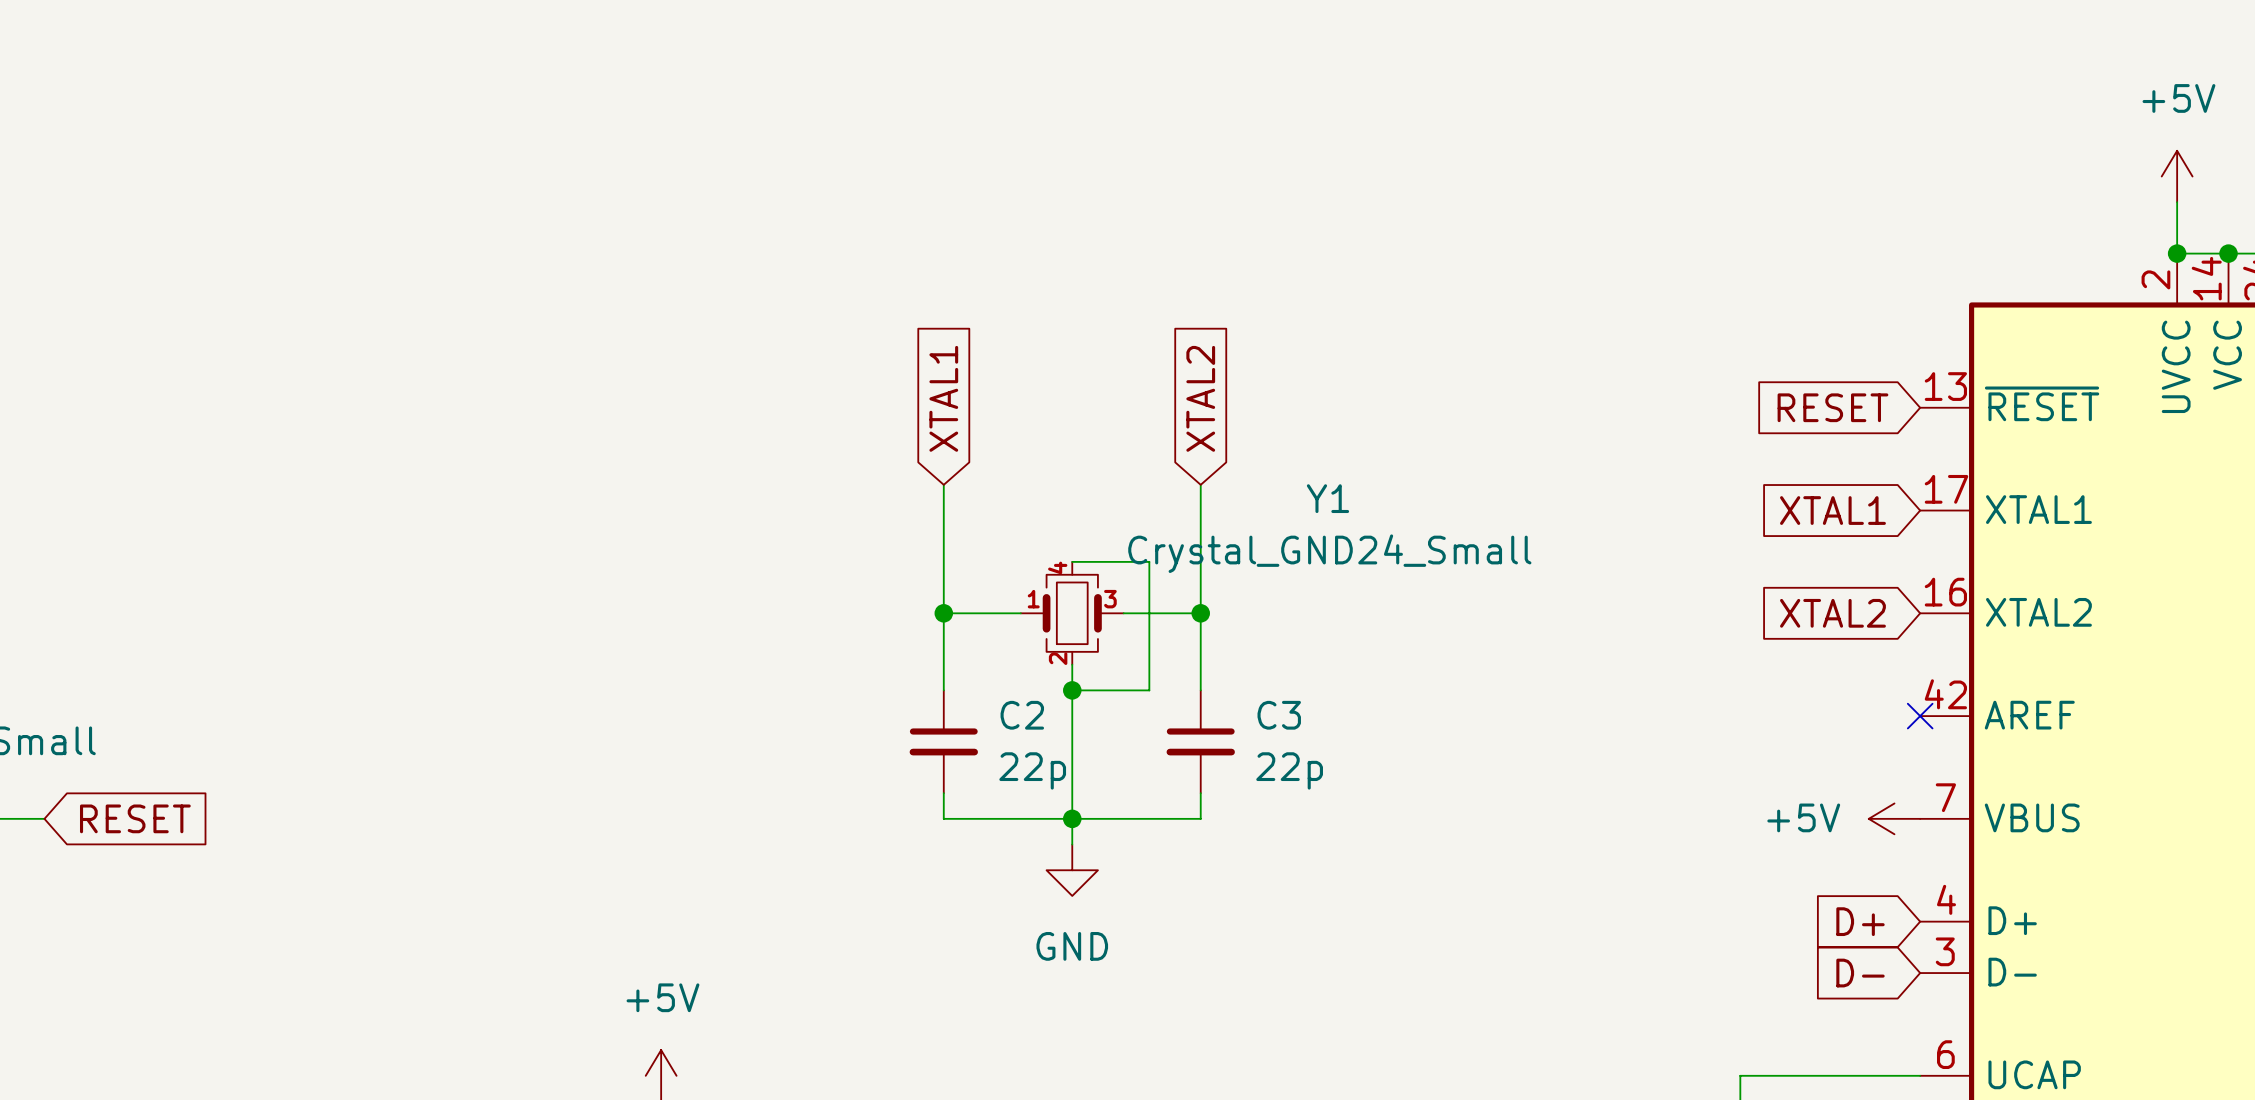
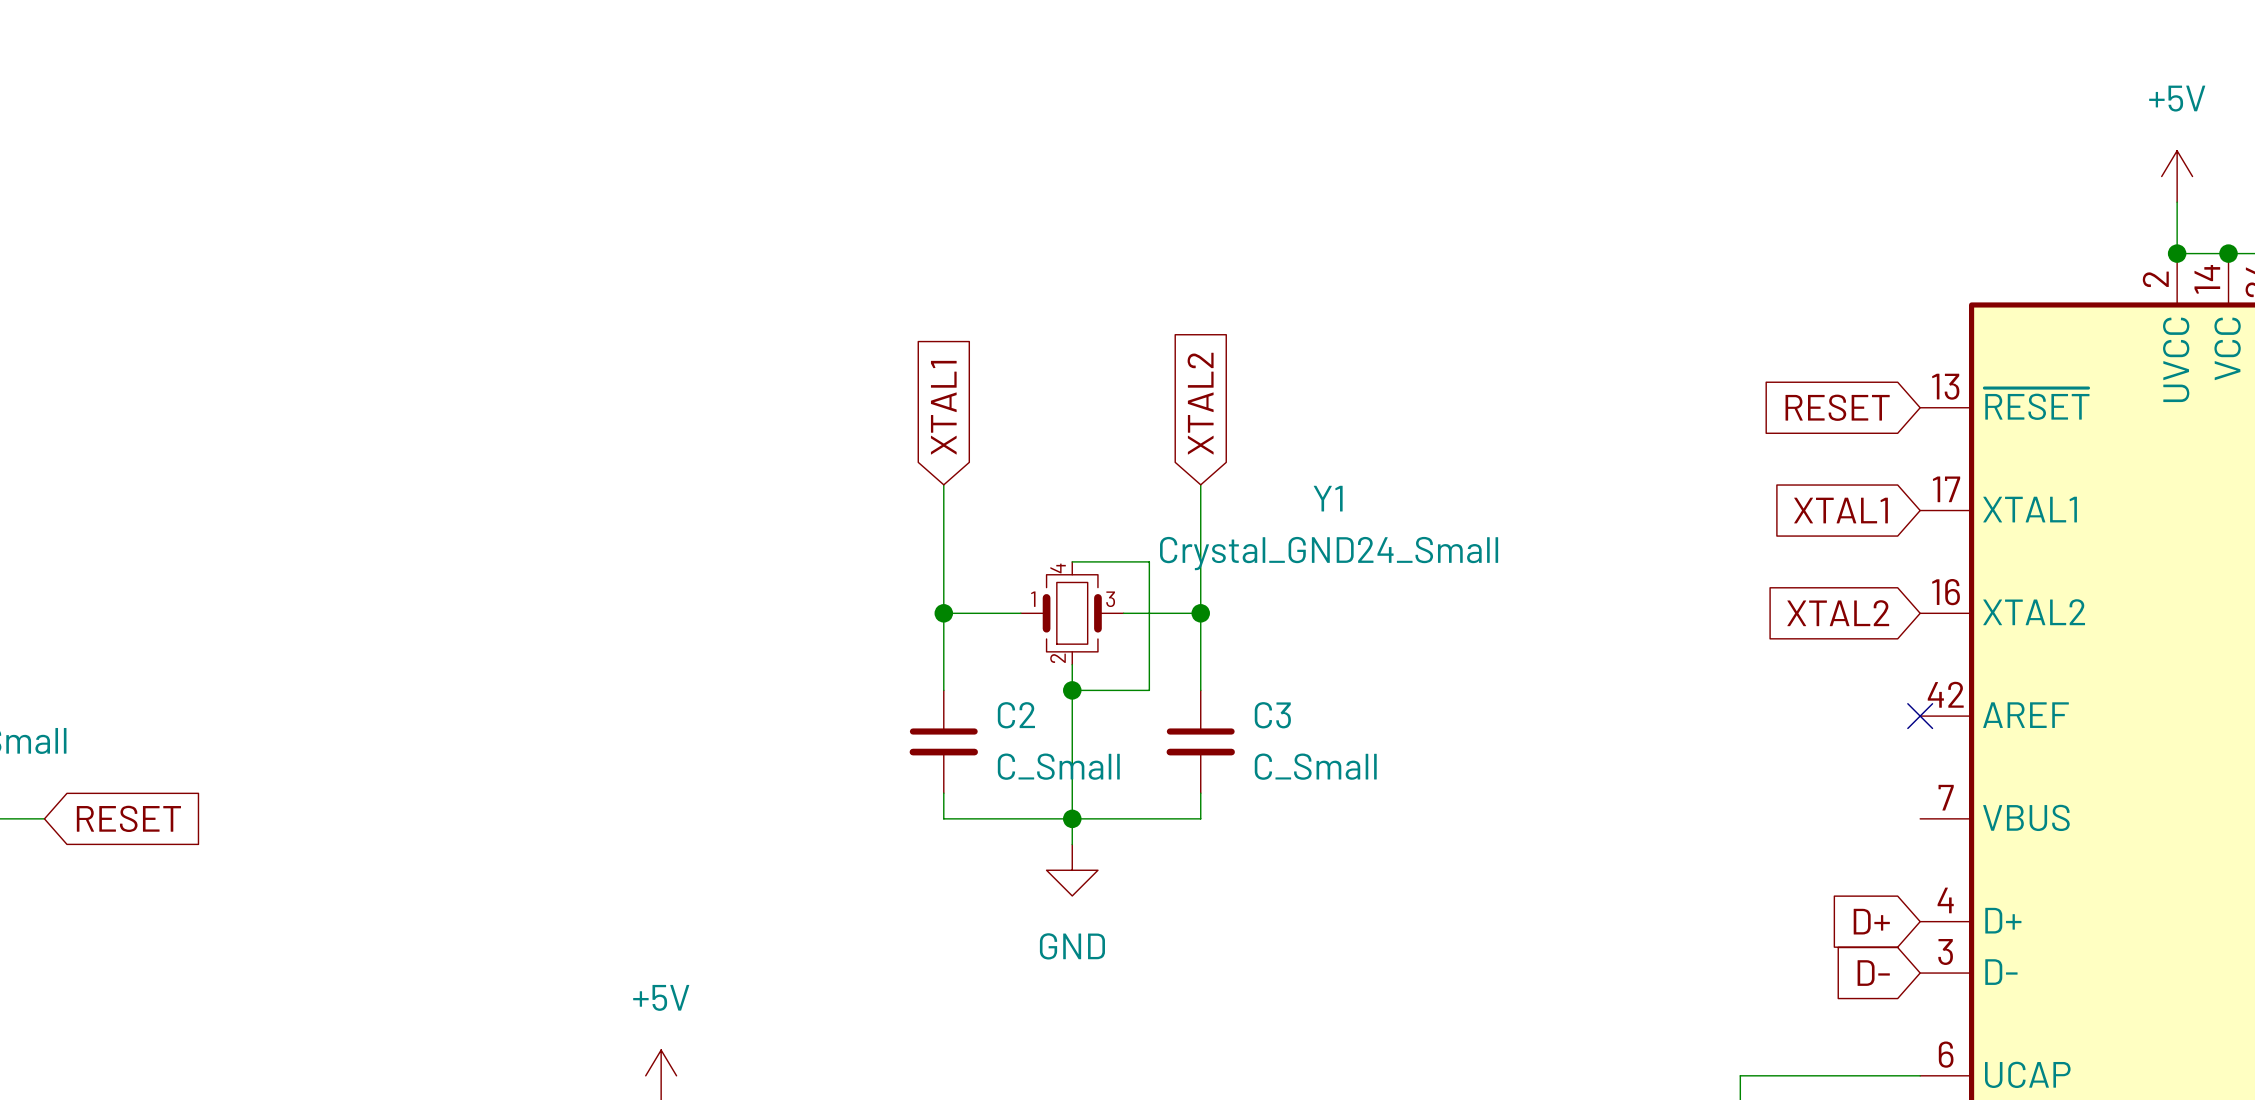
C2 value: 22p (1032, 770) -> C_Small (1058, 766)
C3 value: 22p (1289, 770) -> C_Small (1315, 766)
power symbol: +5V (1894, 818) -> none

